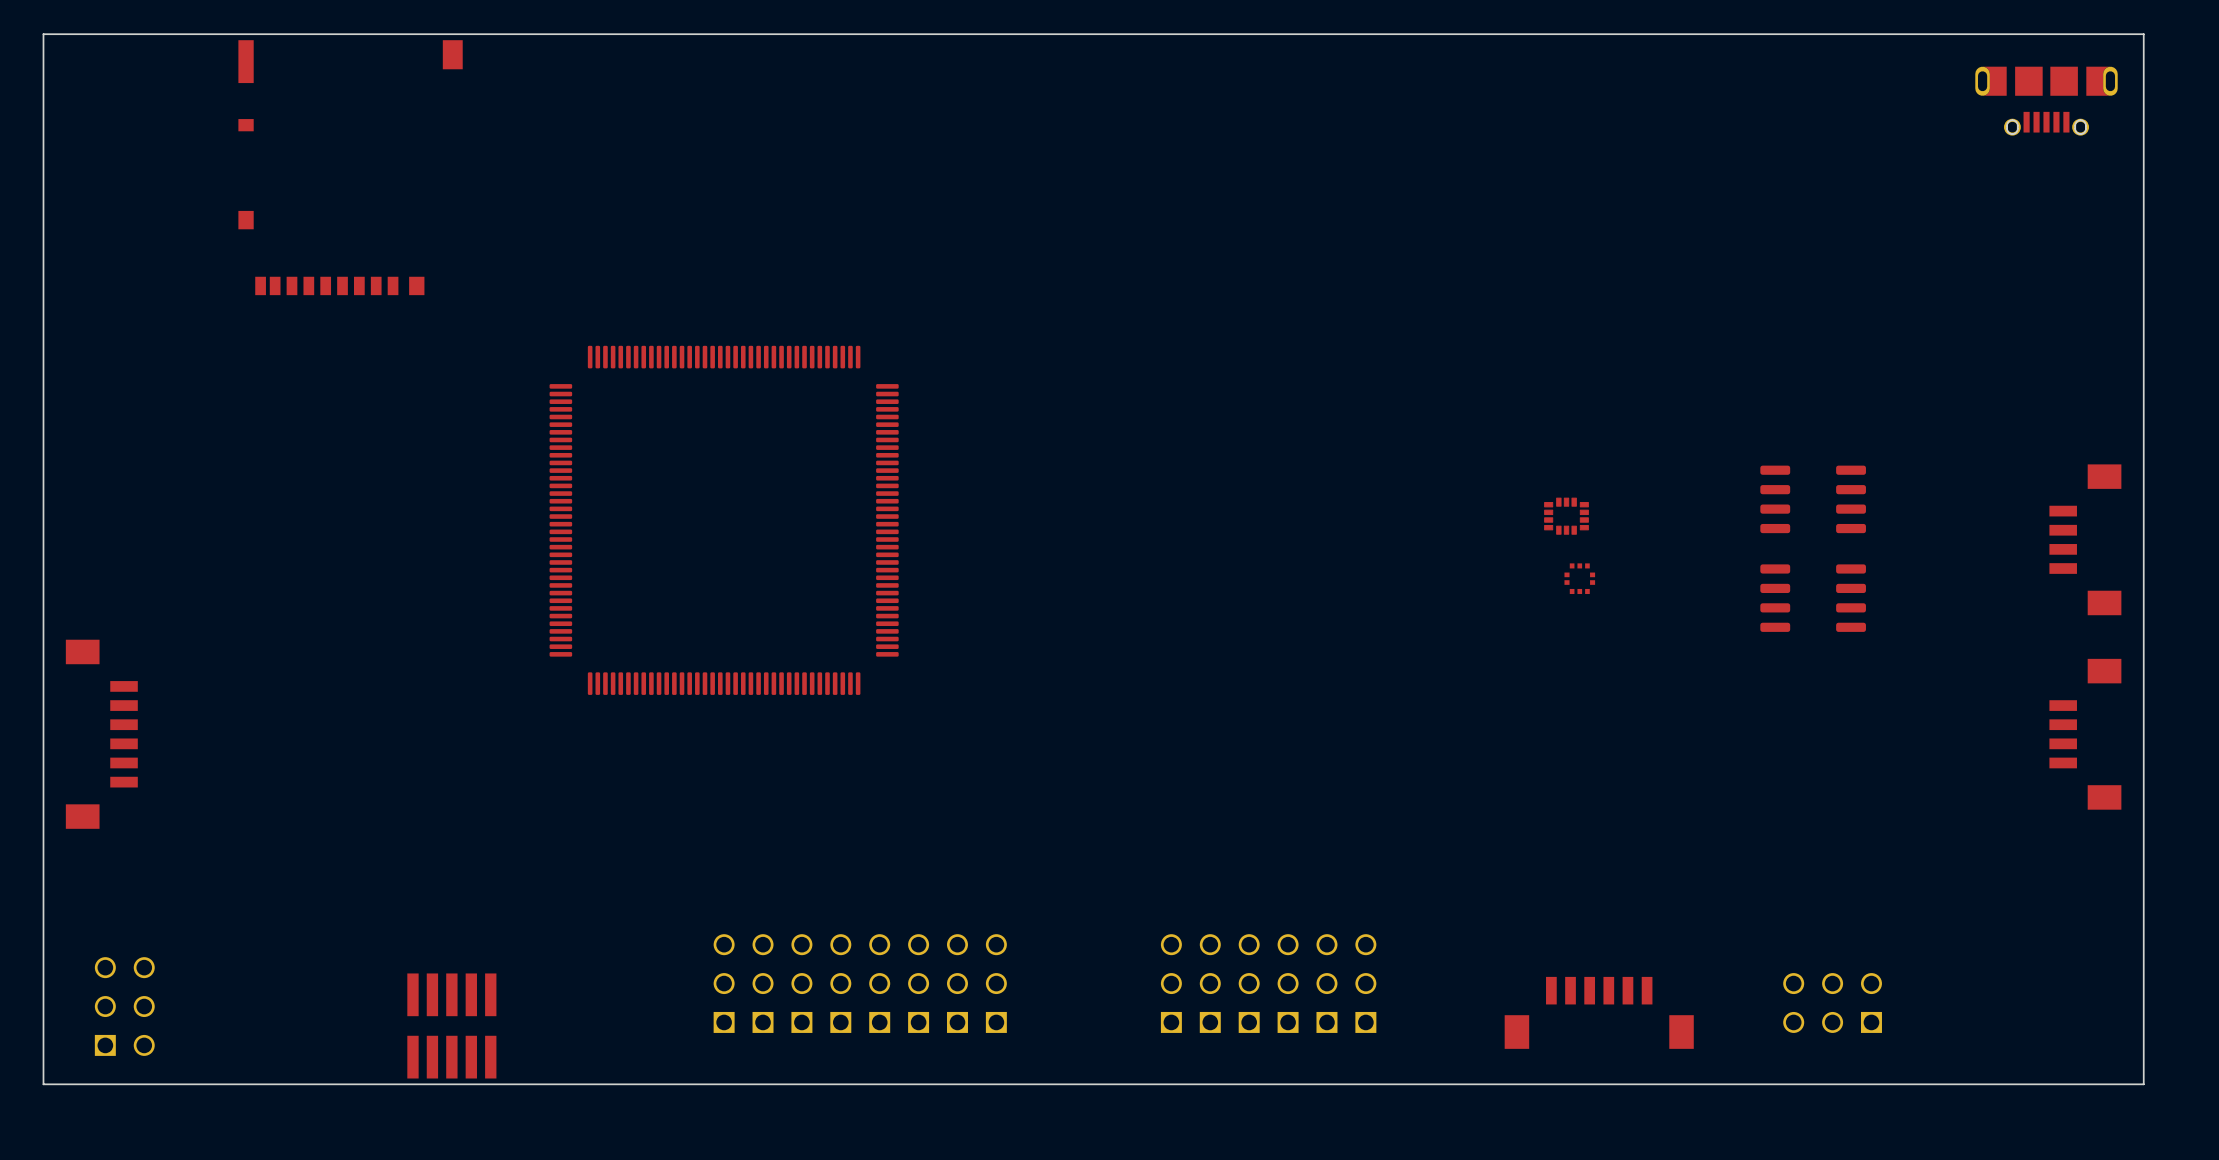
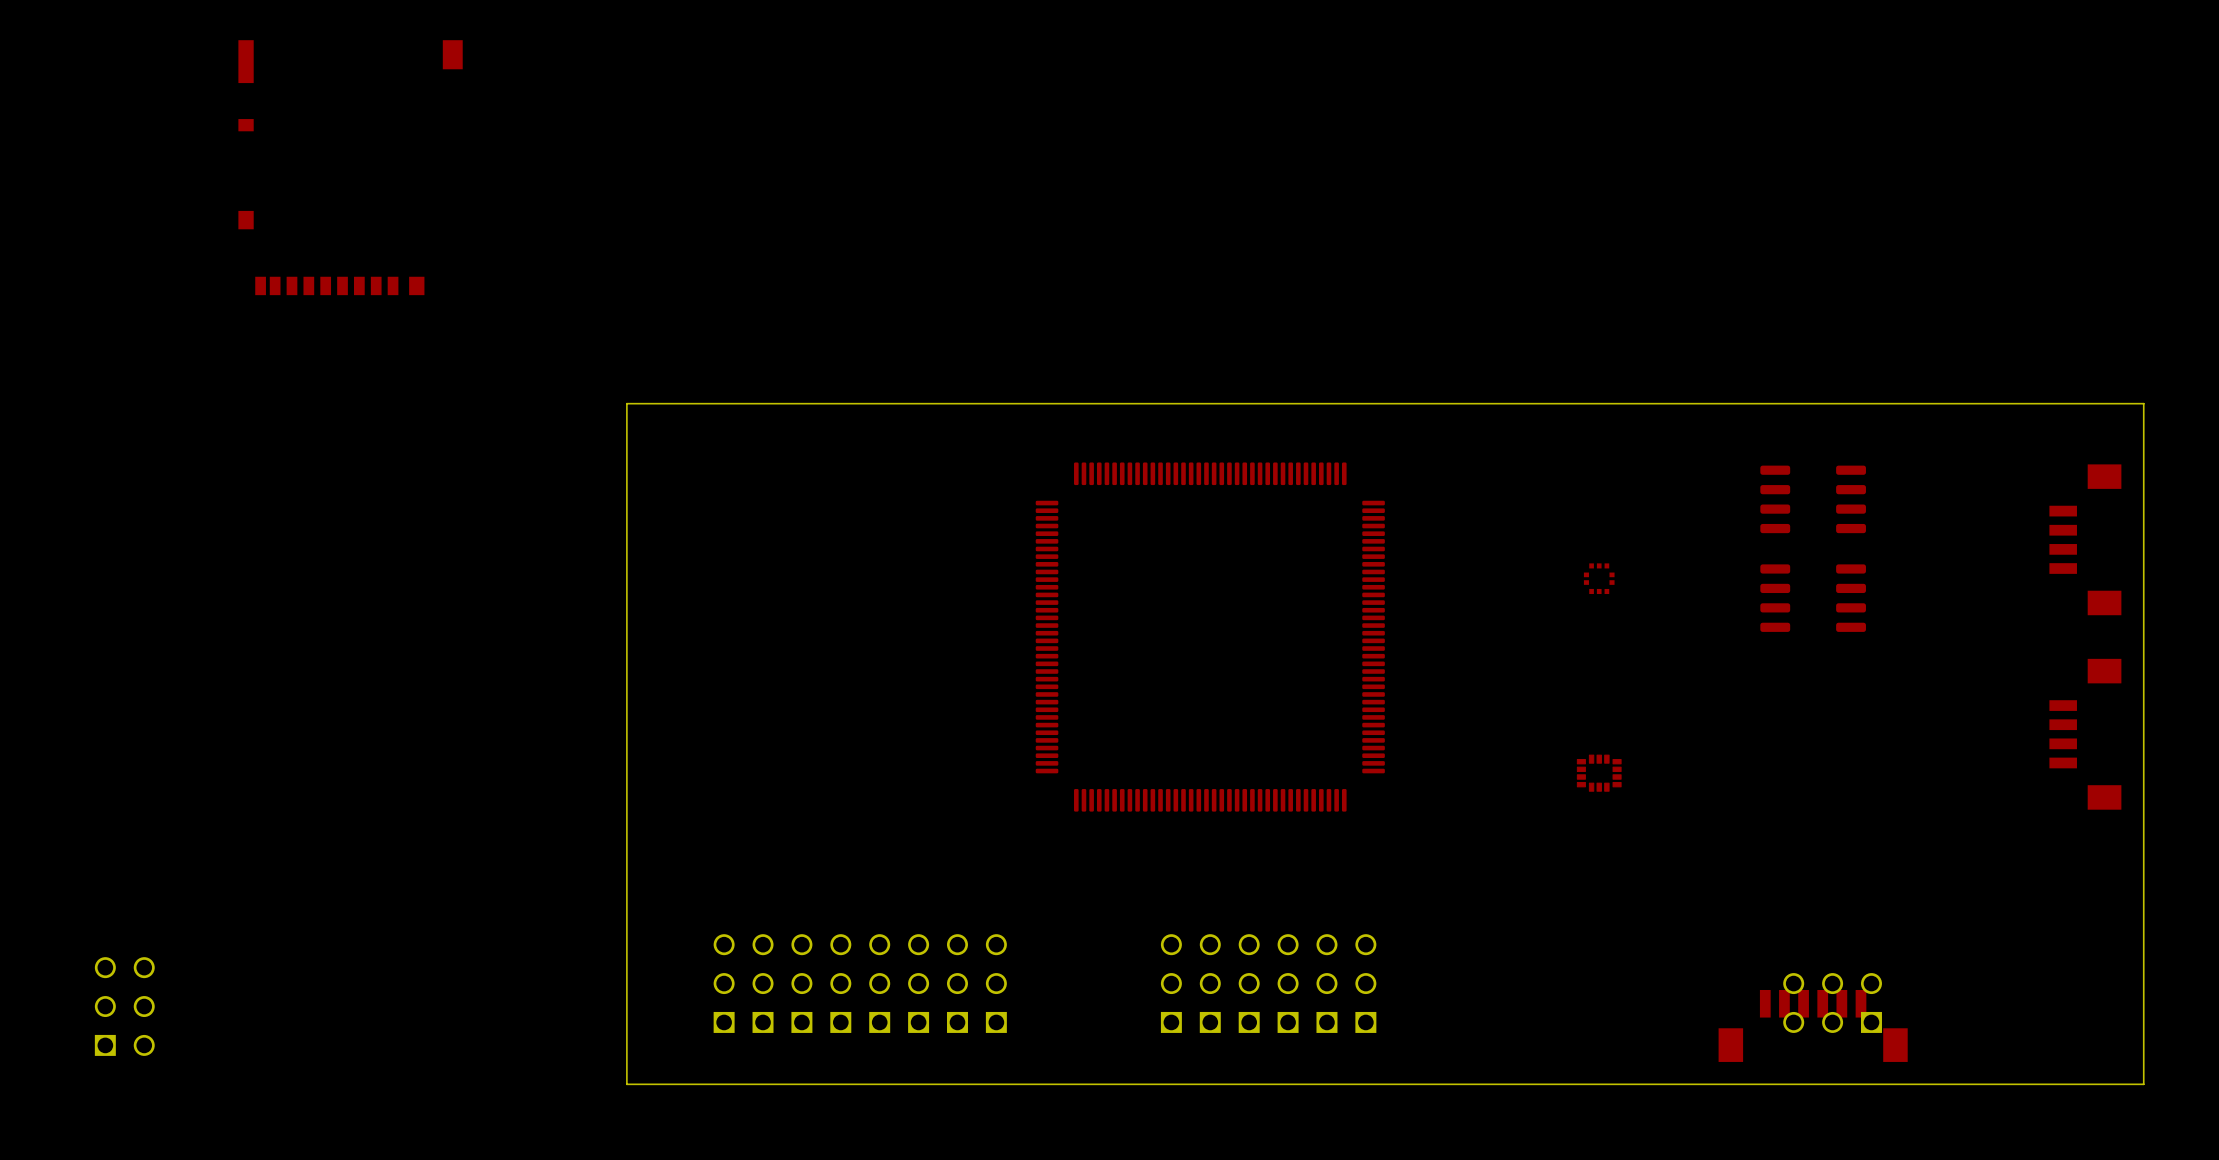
part: (2046, 101) -> none
board edge: (2143, 403) (2143, 34) (43, 34) (43, 1084) (626, 1084) -> (2143, 403) (626, 403) (626, 1084)
part position: (1566, 516) -> (1599, 773)
part: (724, 520) -> none
part position: (1579, 578) -> (1599, 578)
part: none -> (1210, 637)
part: (101, 734) -> none
part position: (1599, 1012) -> (1813, 1025)
part: (451, 1025) -> none

